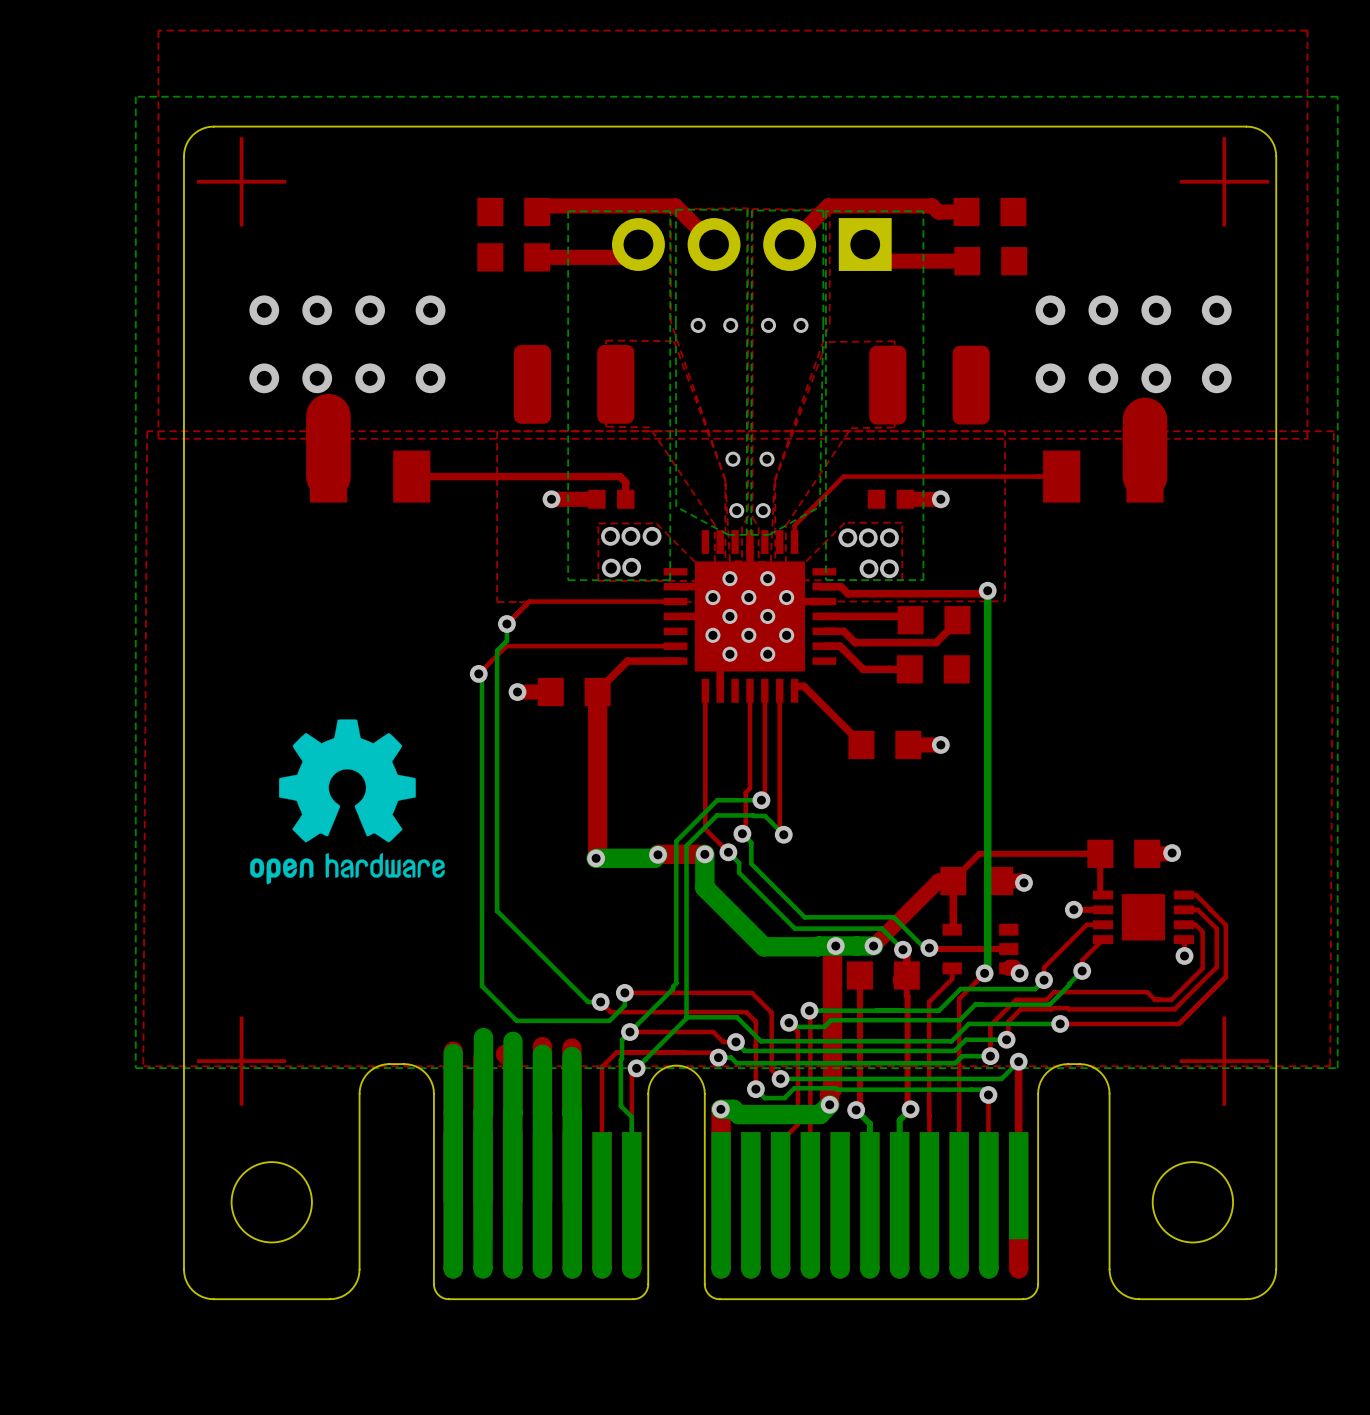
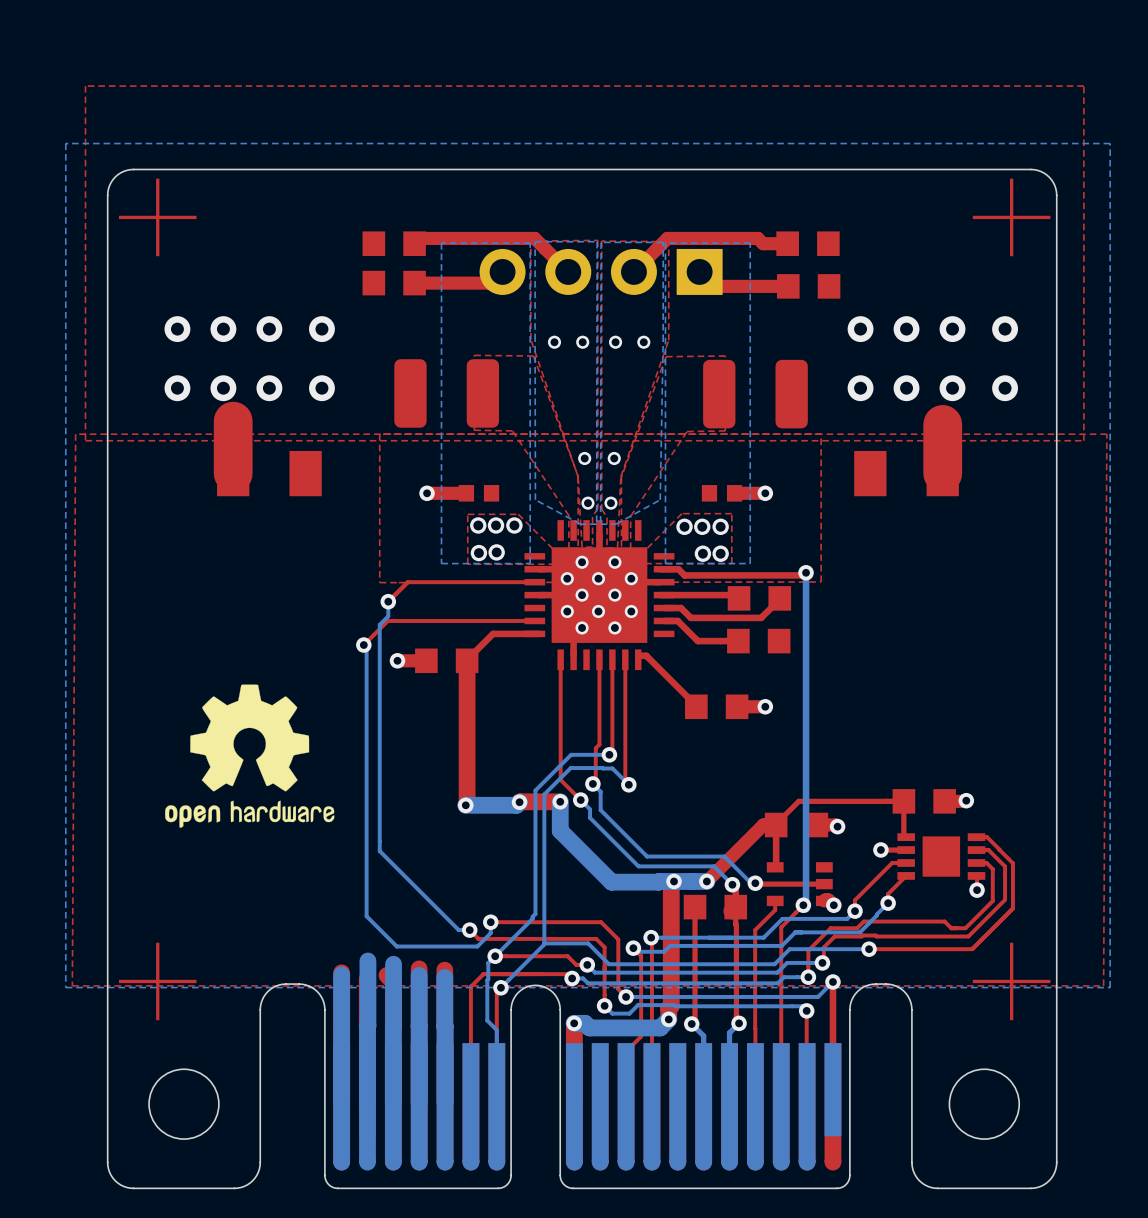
top track: (411, 476) (620, 476) (625, 482) (625, 499) -> none
top track: (1061, 476) (843, 476) (794, 525) (794, 542) -> none

